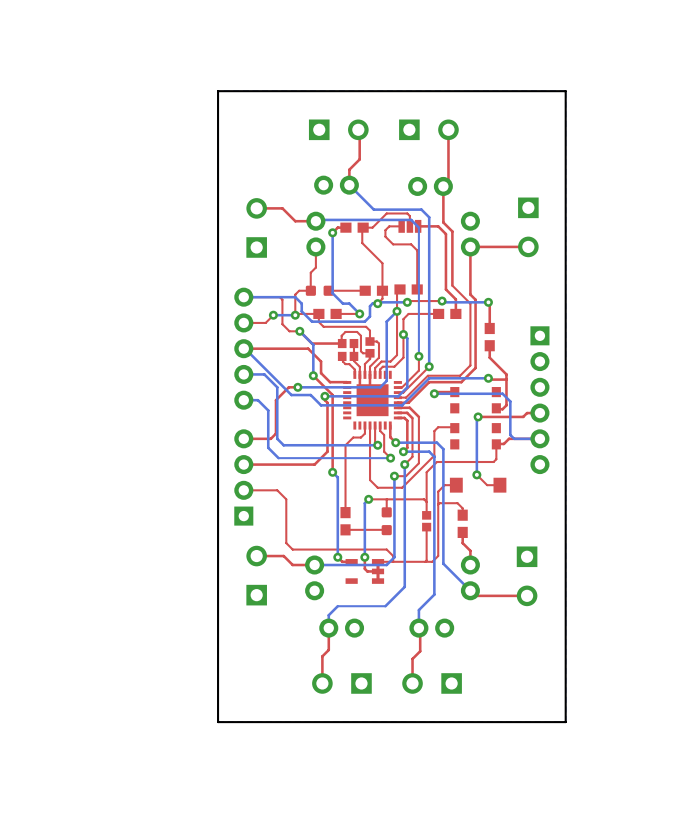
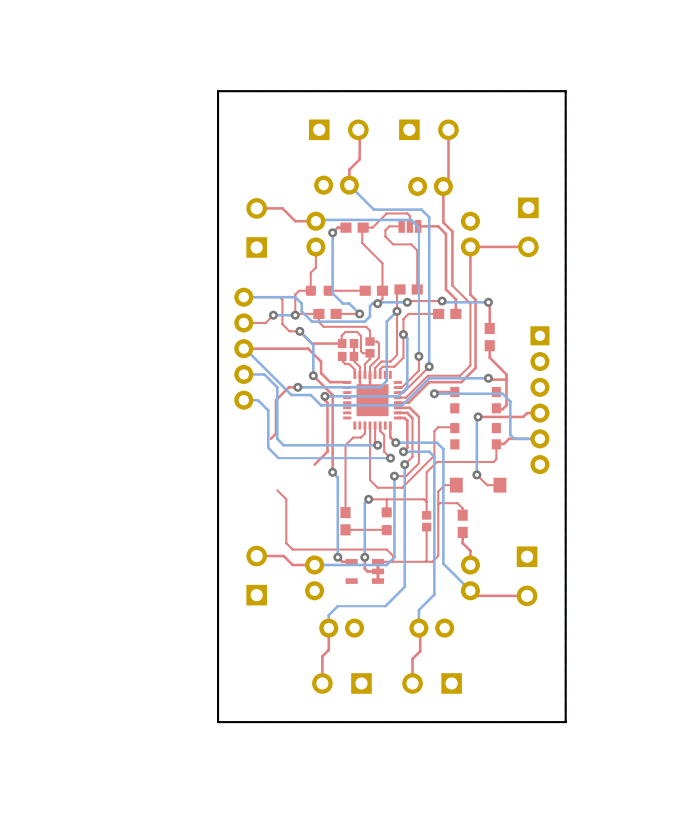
top track: (270, 438) (243, 438) -> none
top track: (314, 464) (243, 464) -> none
part: (243, 477) -> none
top track: (277, 490) (243, 490) -> none

